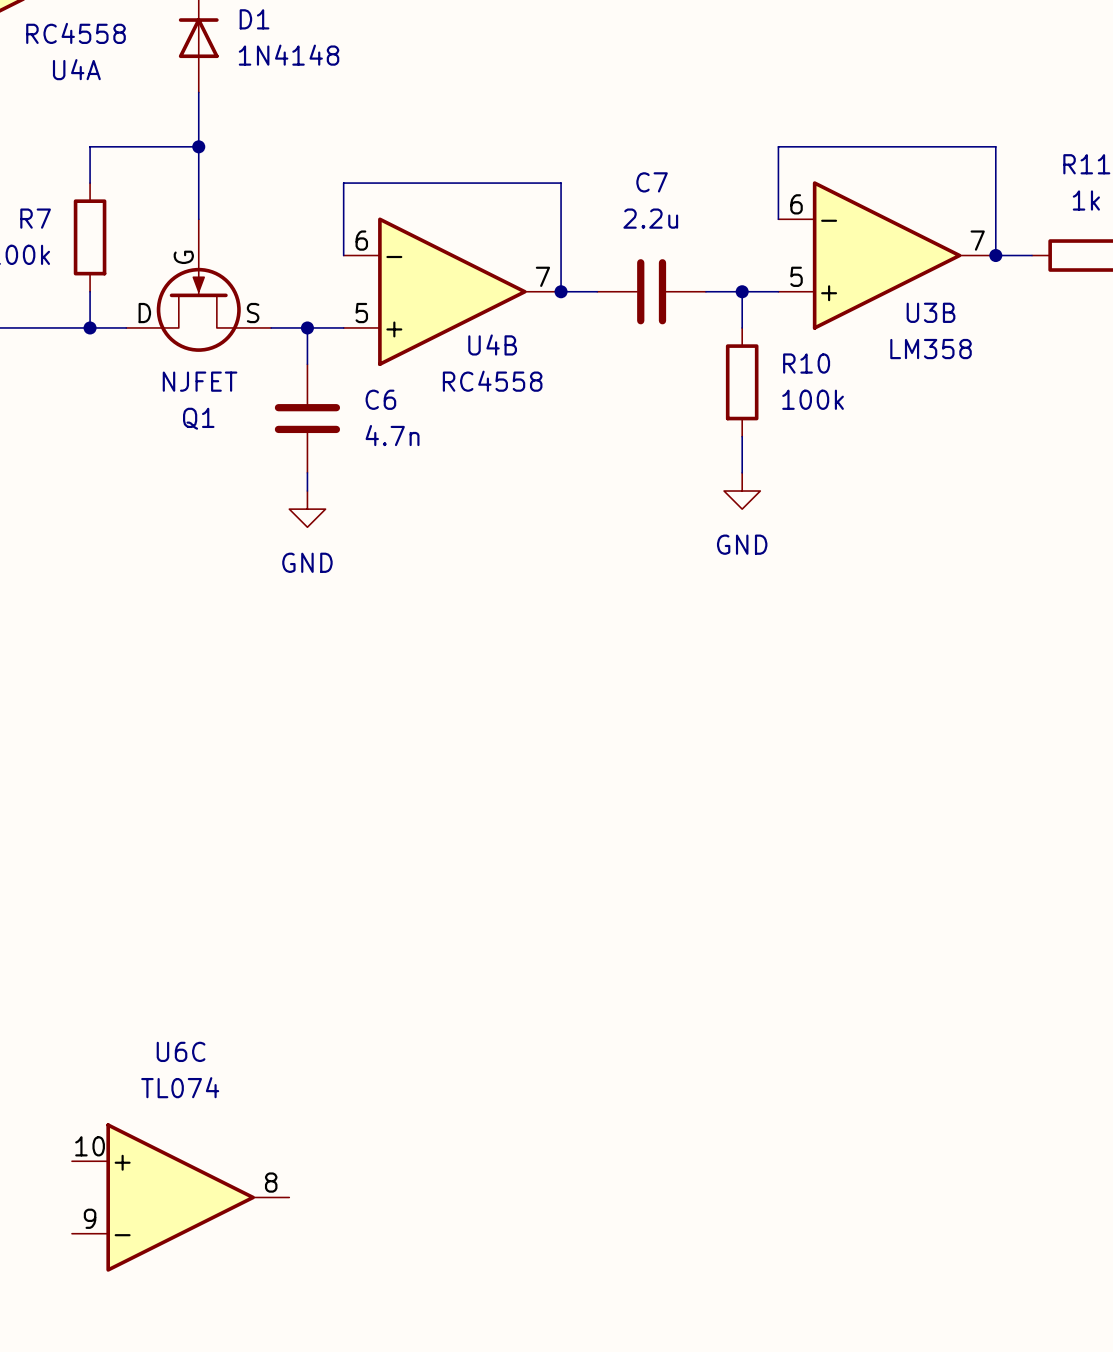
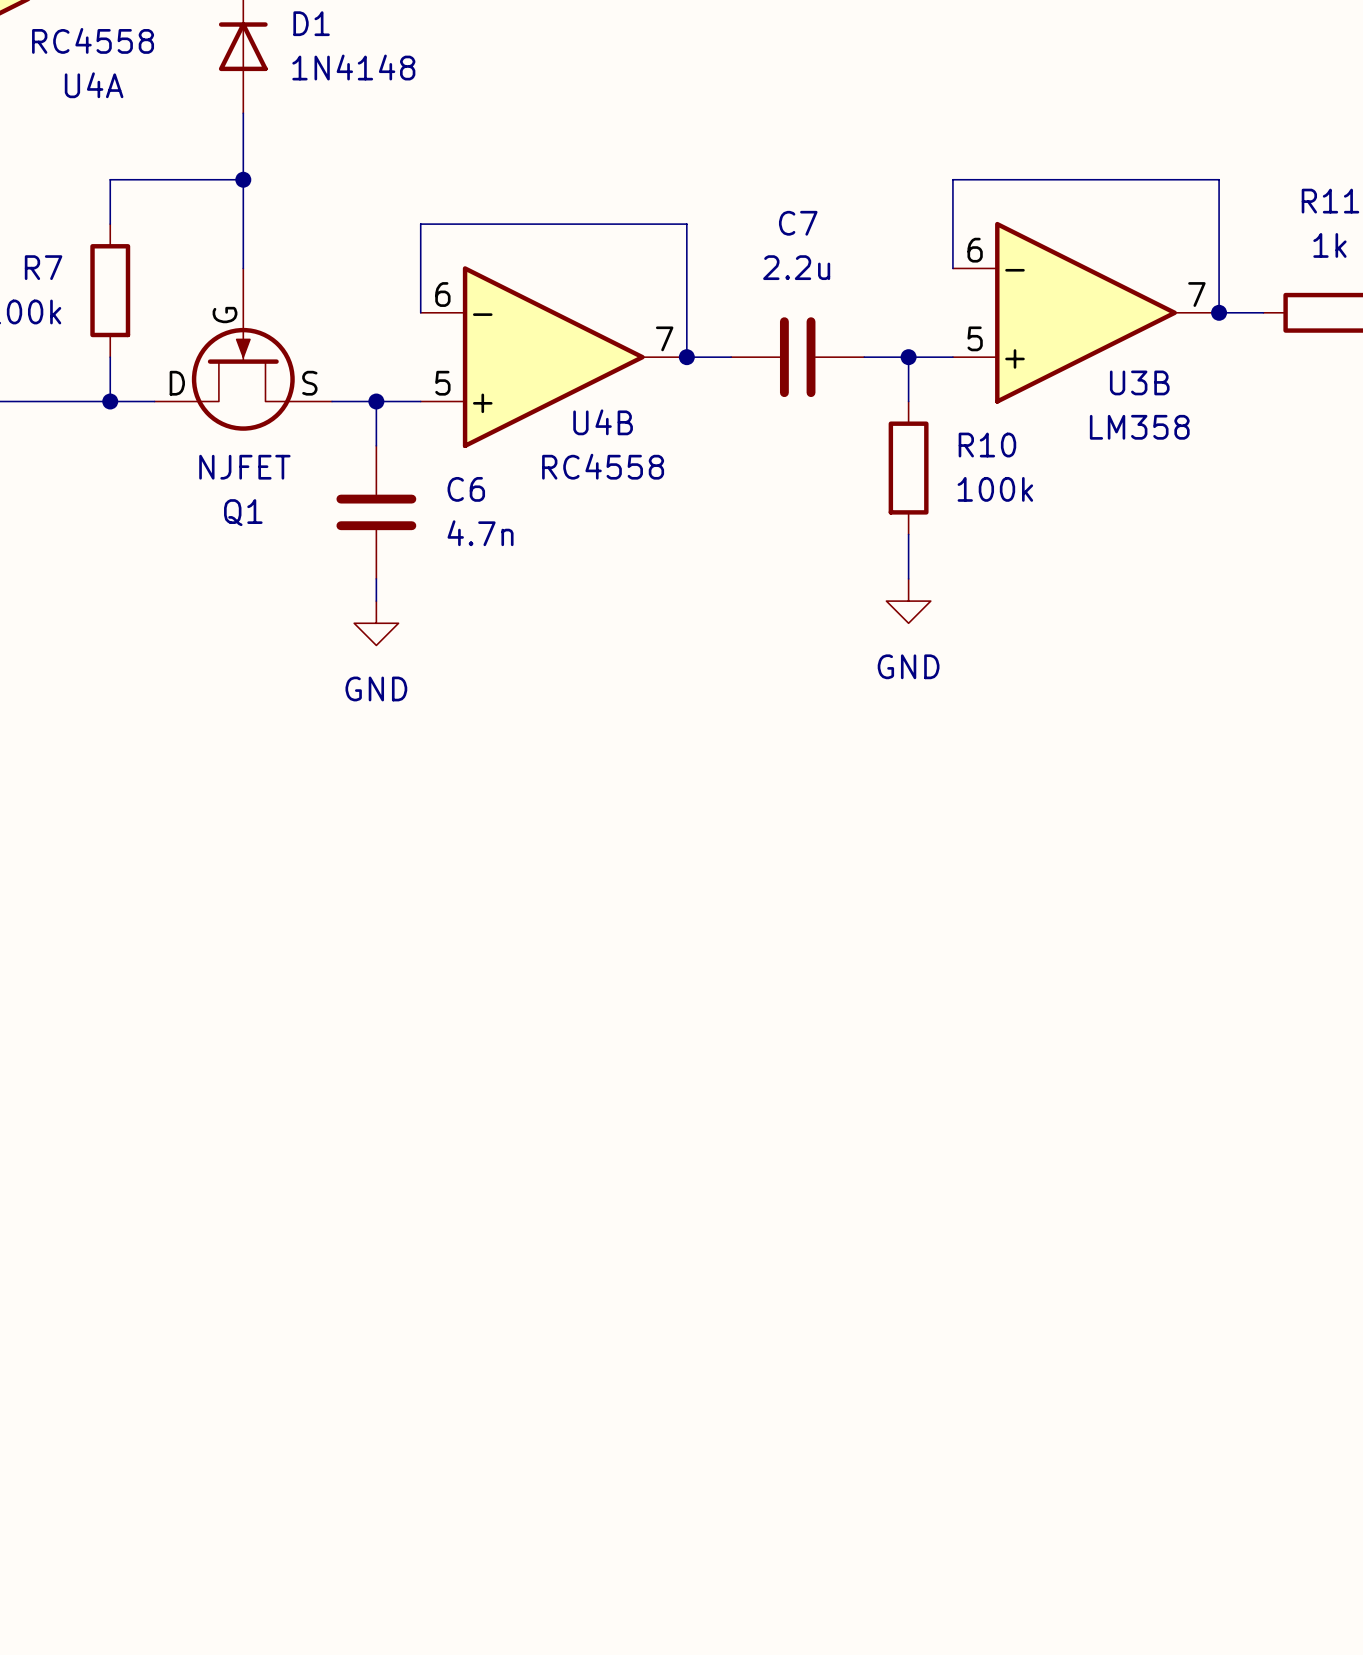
U6C: TL074 (180, 1197) -> none

